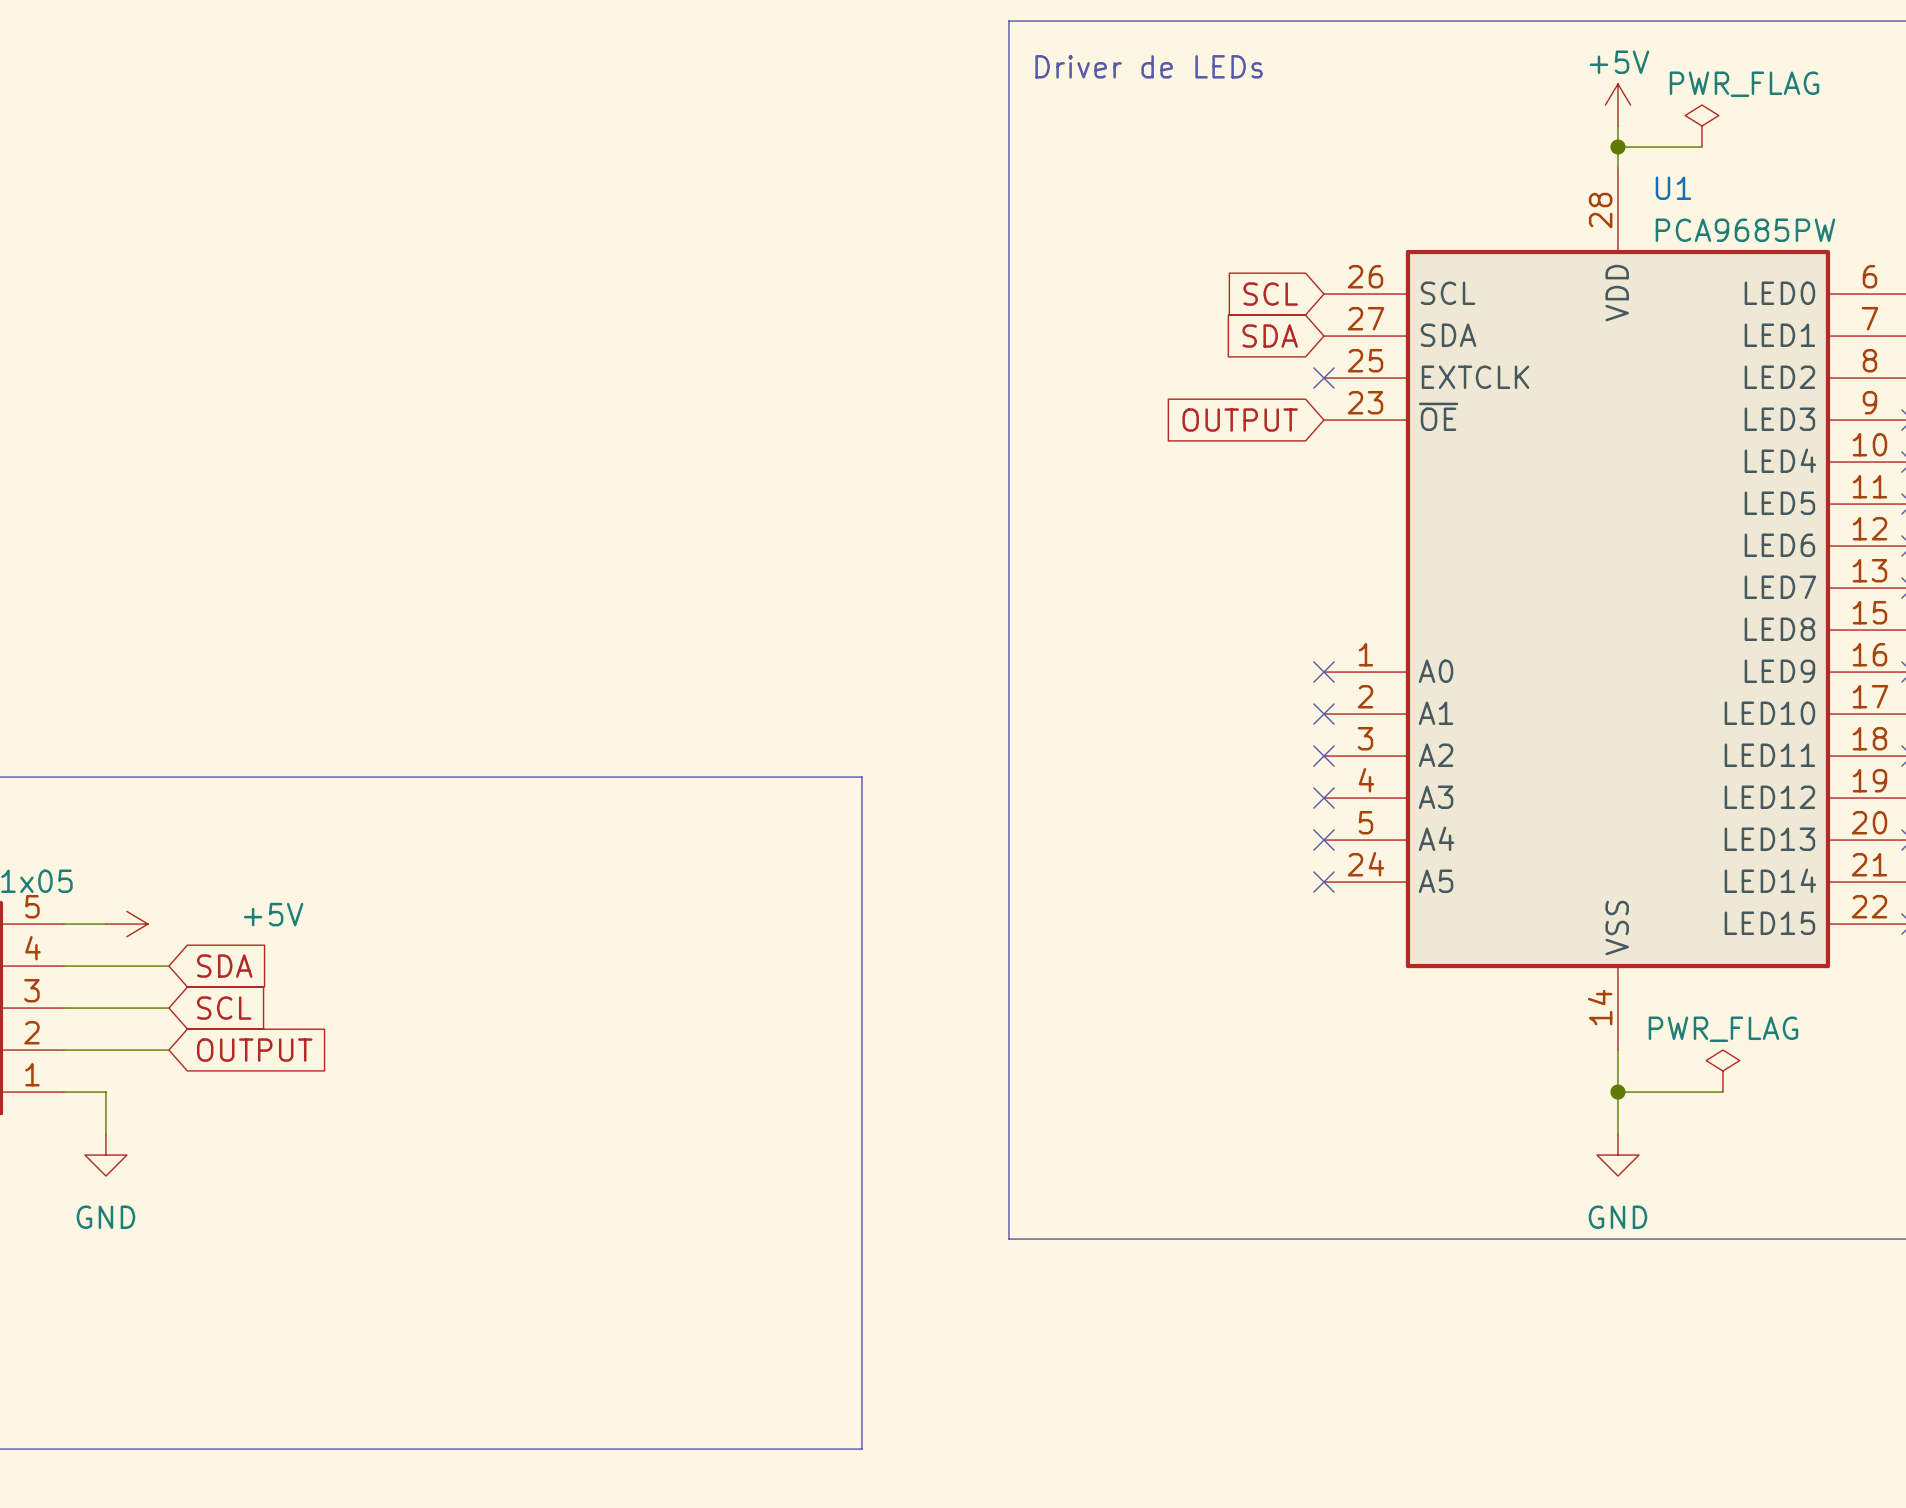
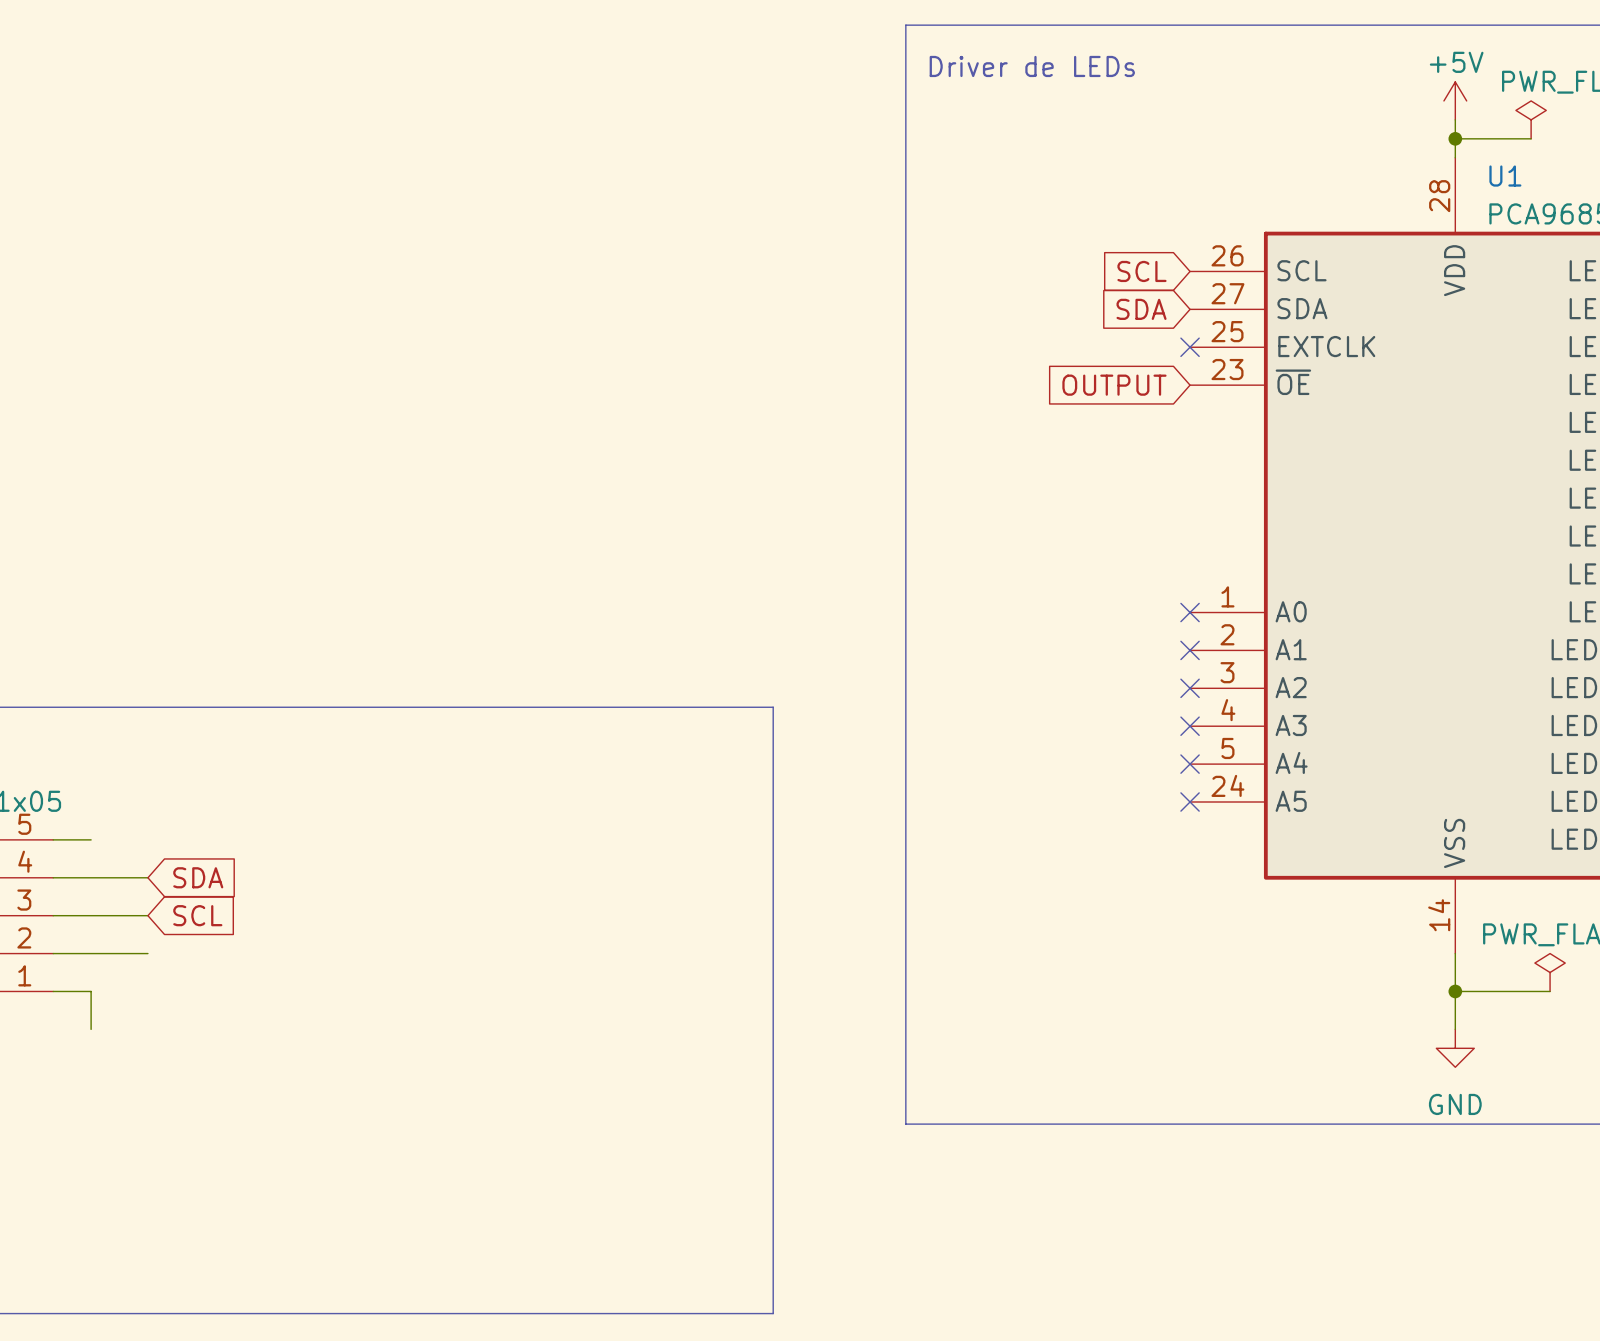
power symbol: +5V (126, 924) -> none
global label: OUTPUT (254, 1050) -> none
power symbol: GND (105, 1155) -> none

